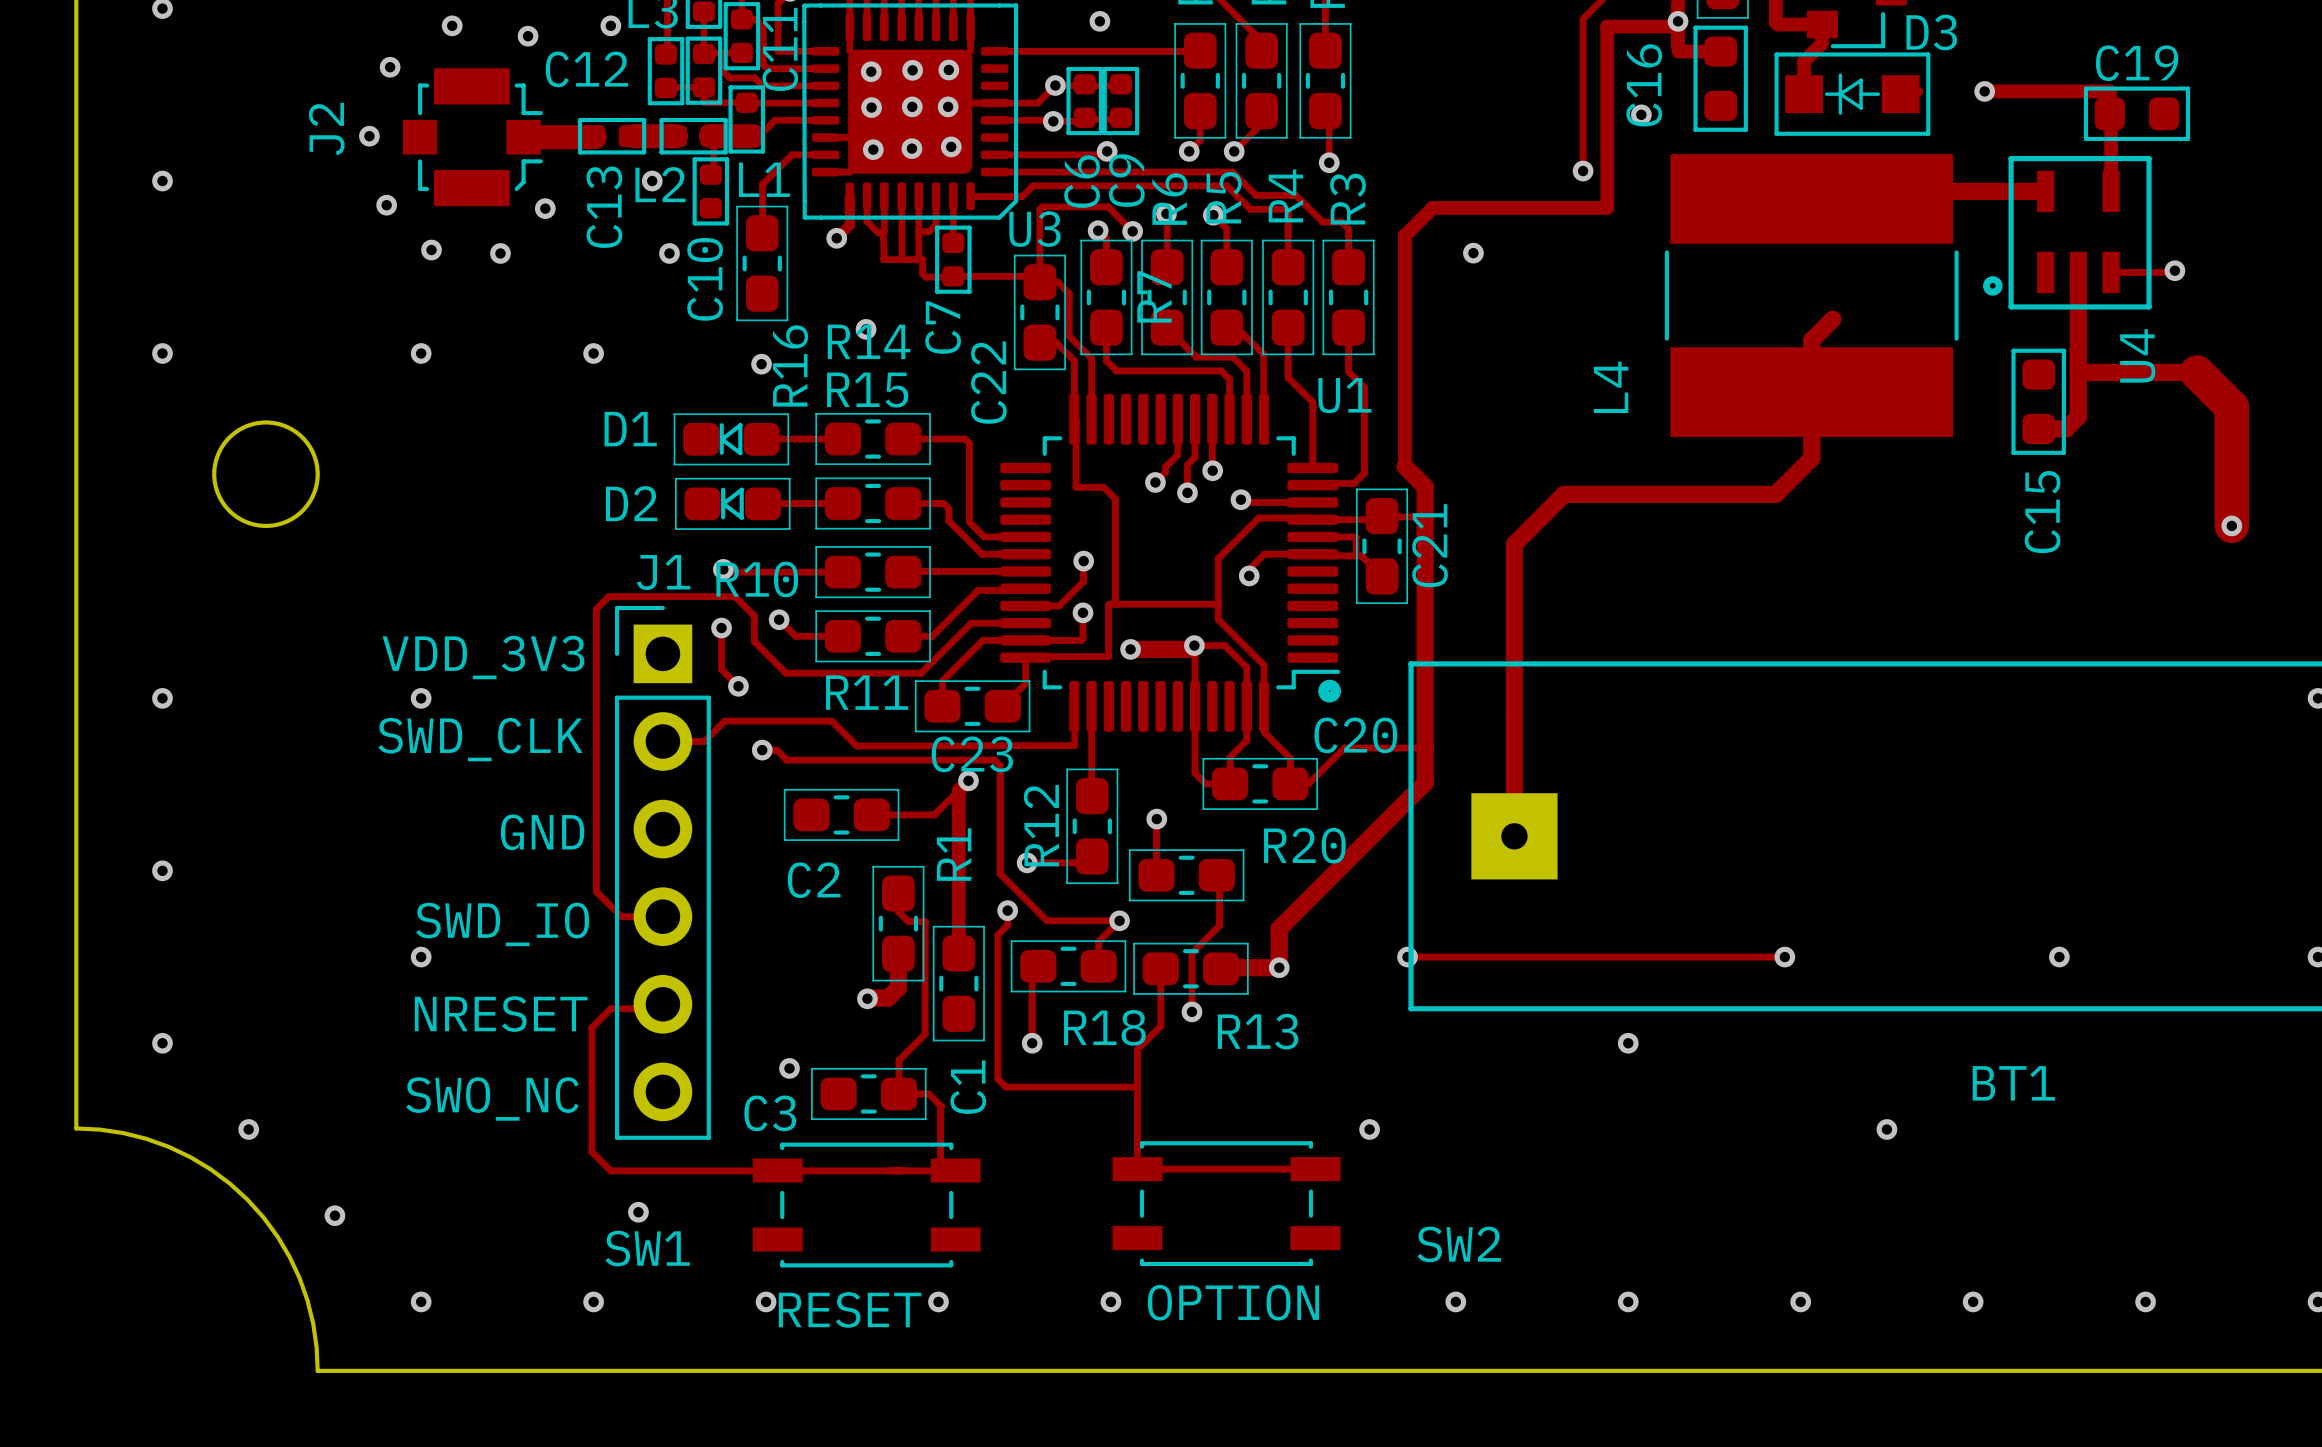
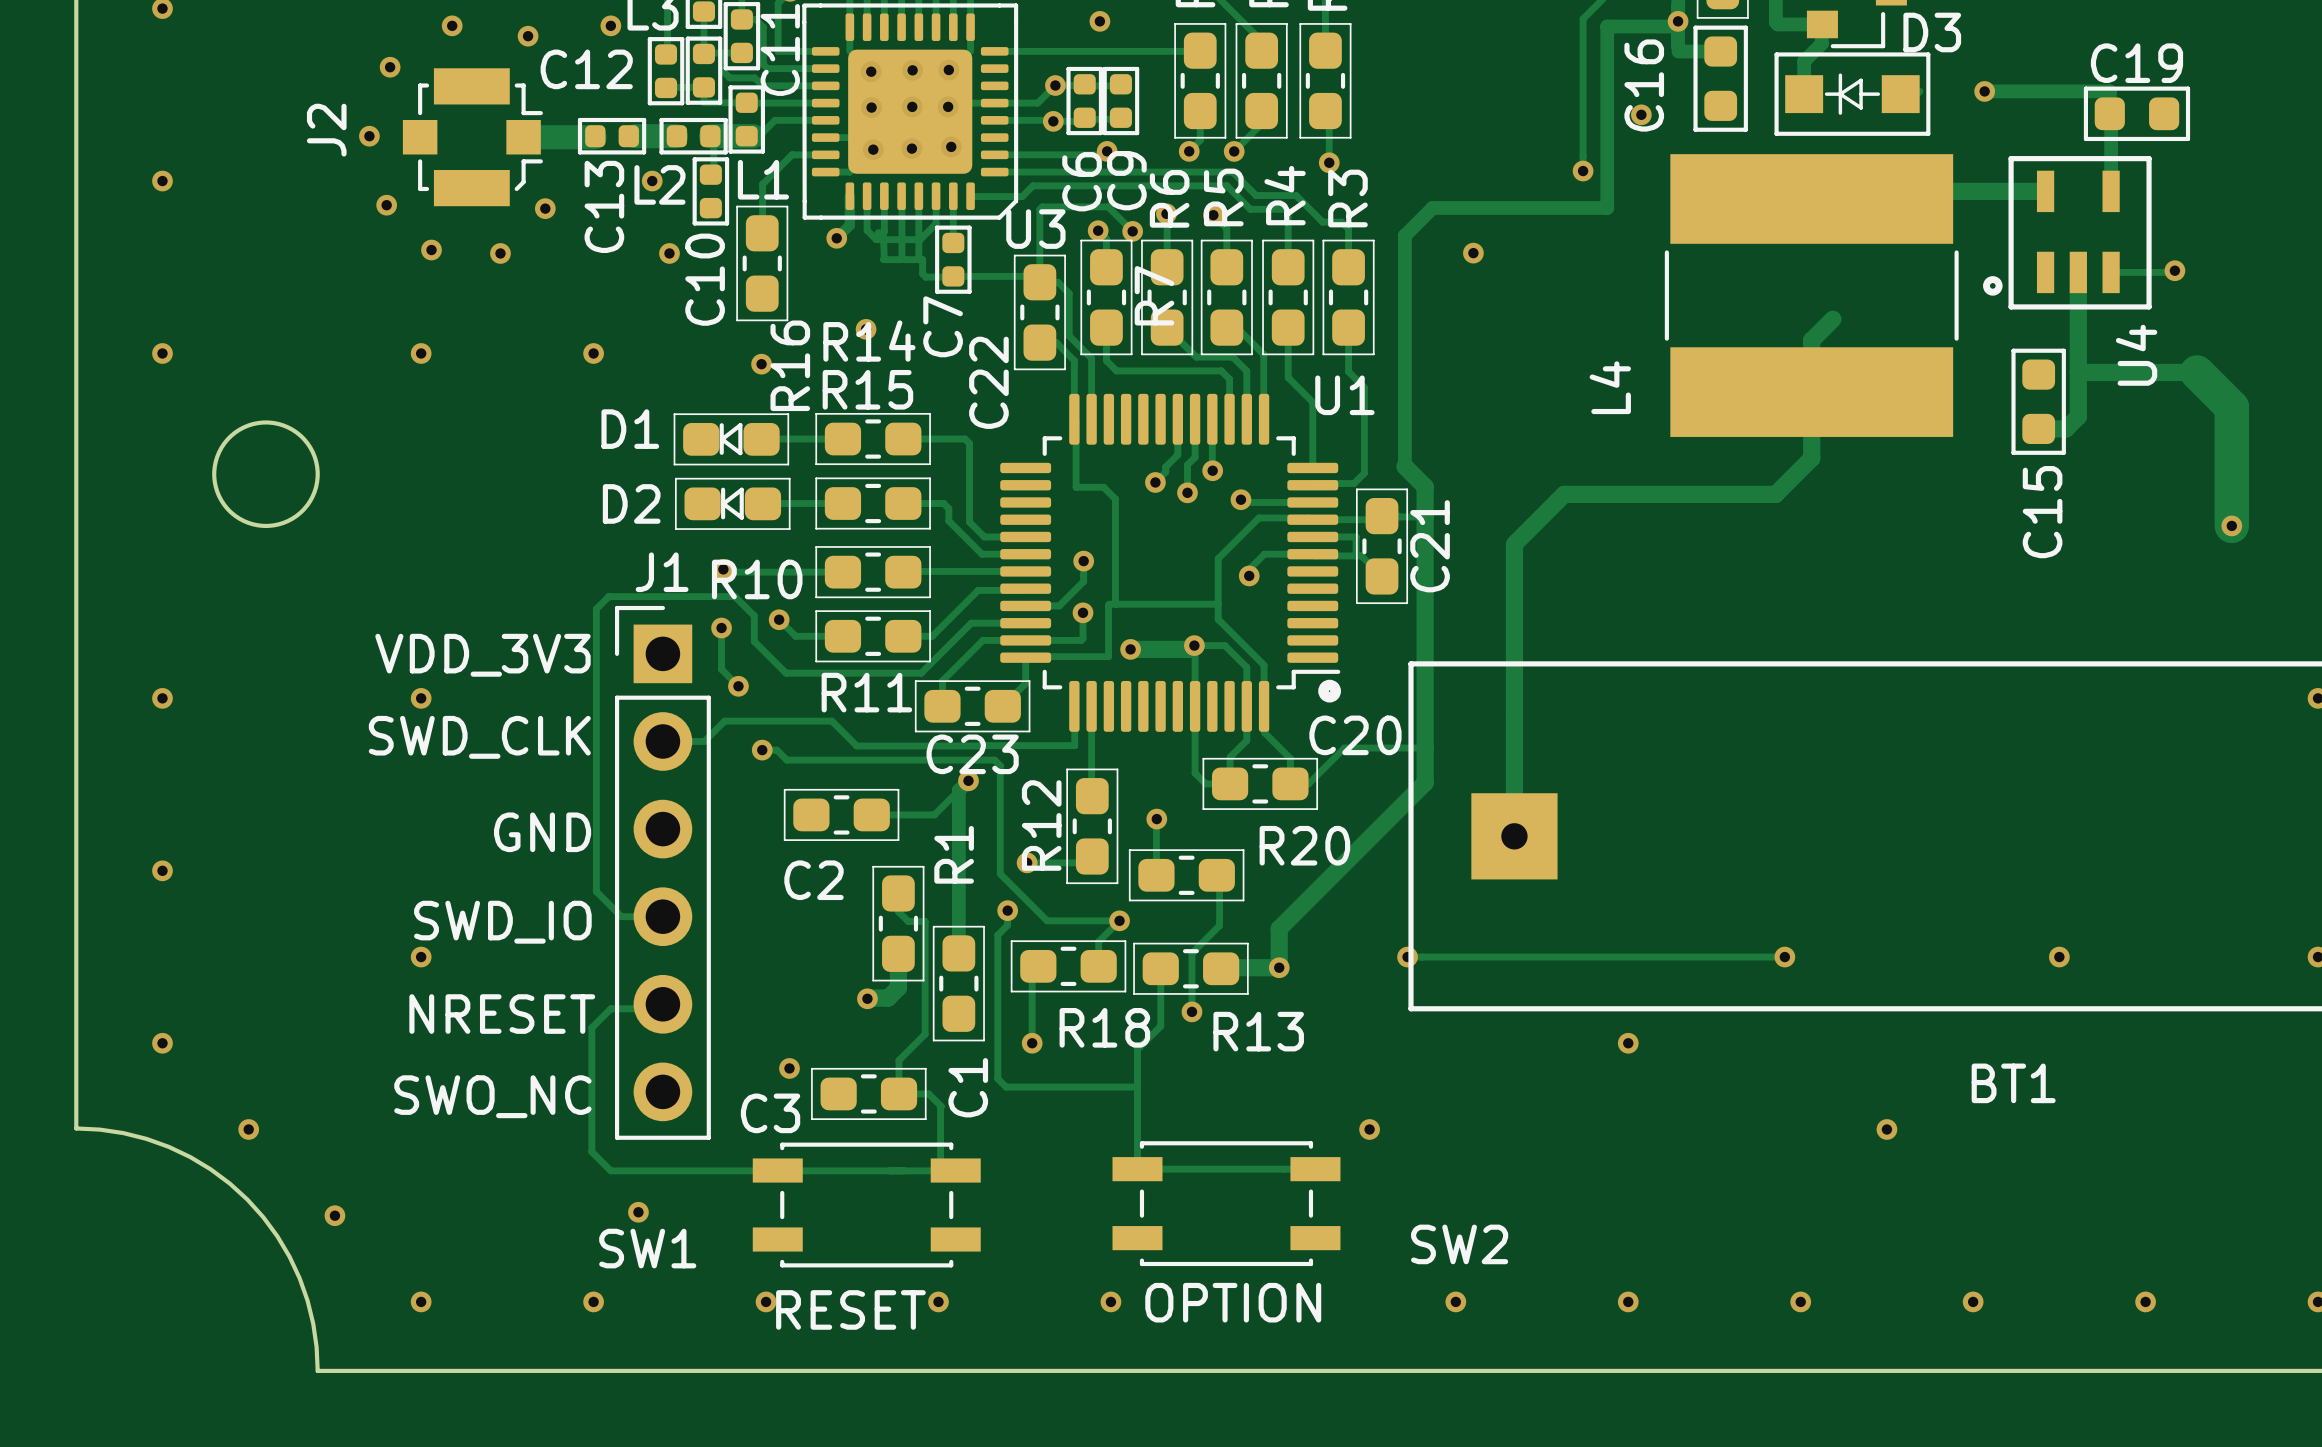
track: (867, 221) (878, 232) -> none
track: (936, 223) (929, 231) (918, 231) -> (936, 223) (920, 239) (876, 239) (867, 230) (867, 221)

